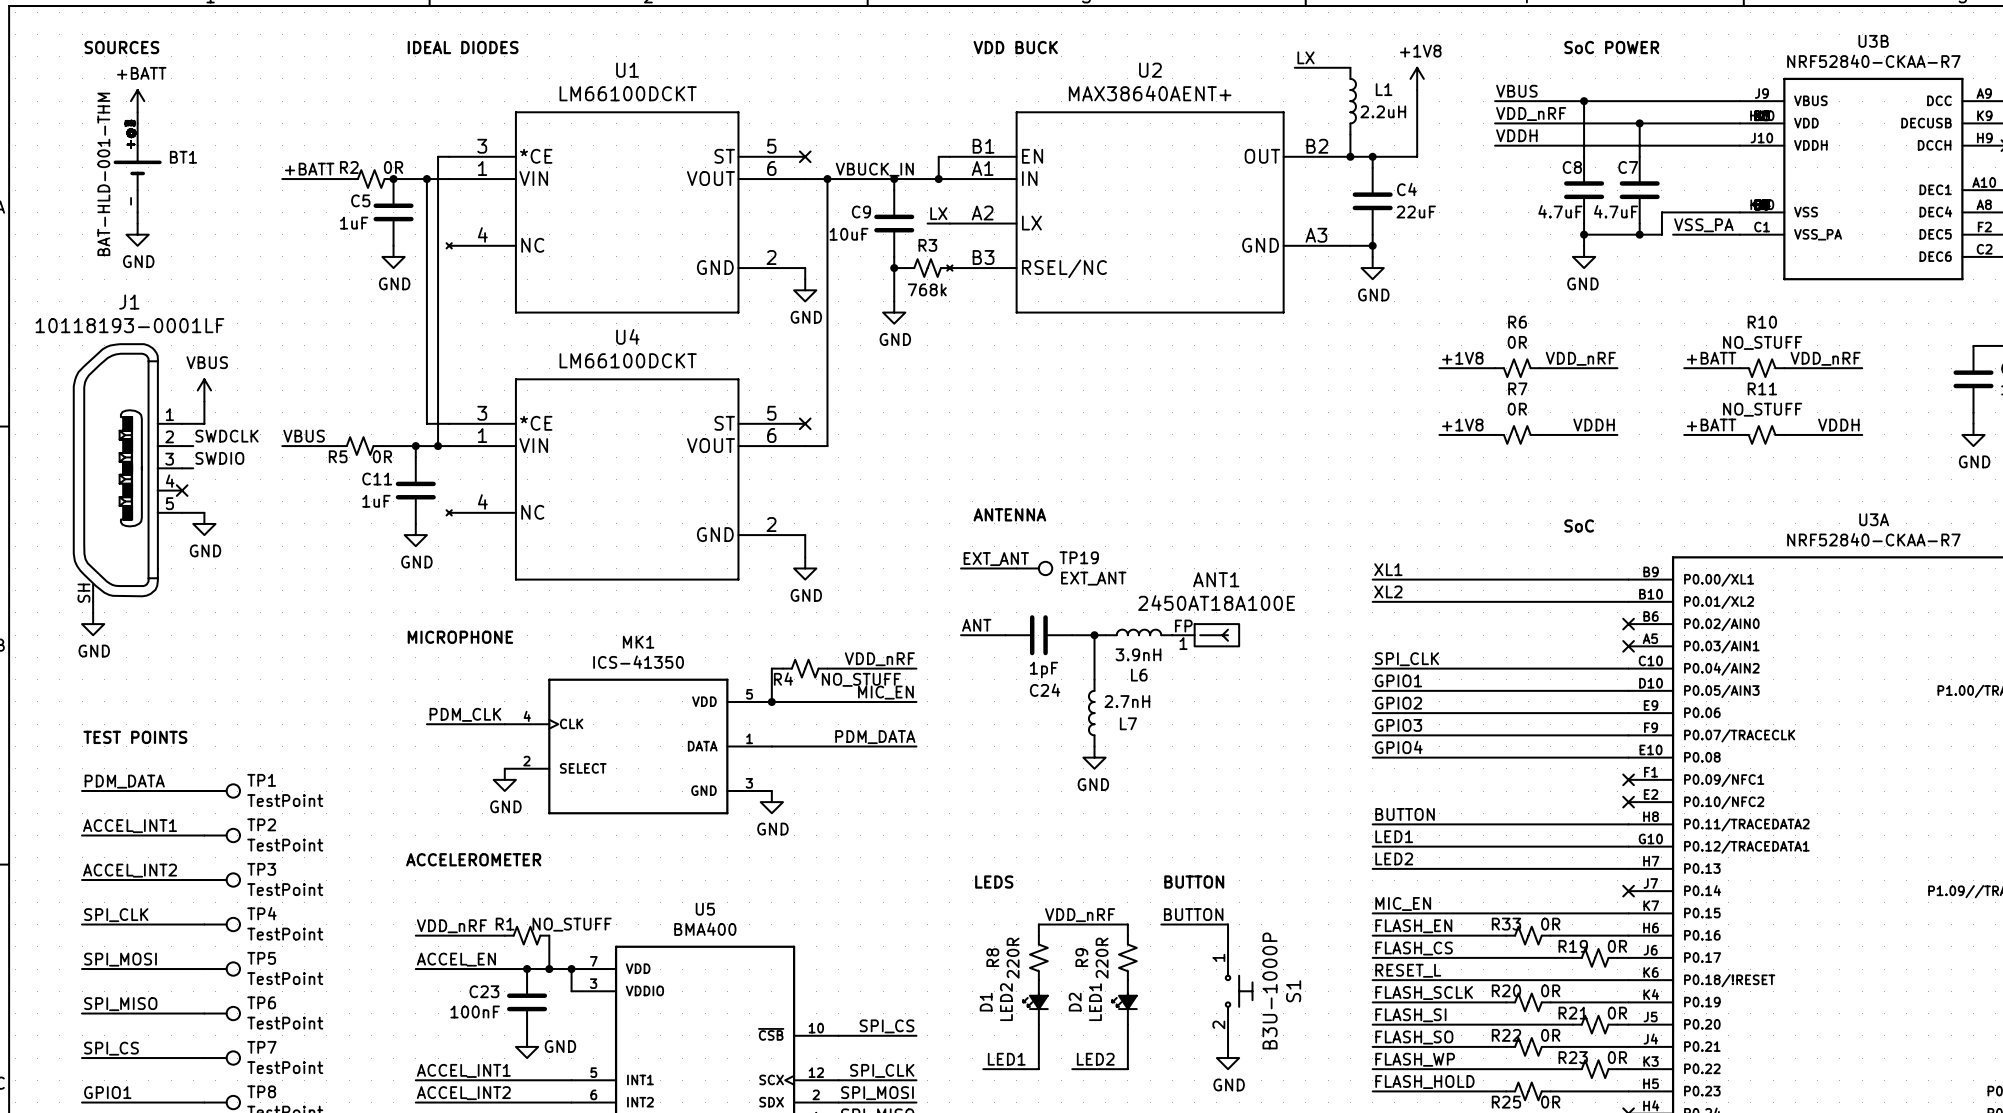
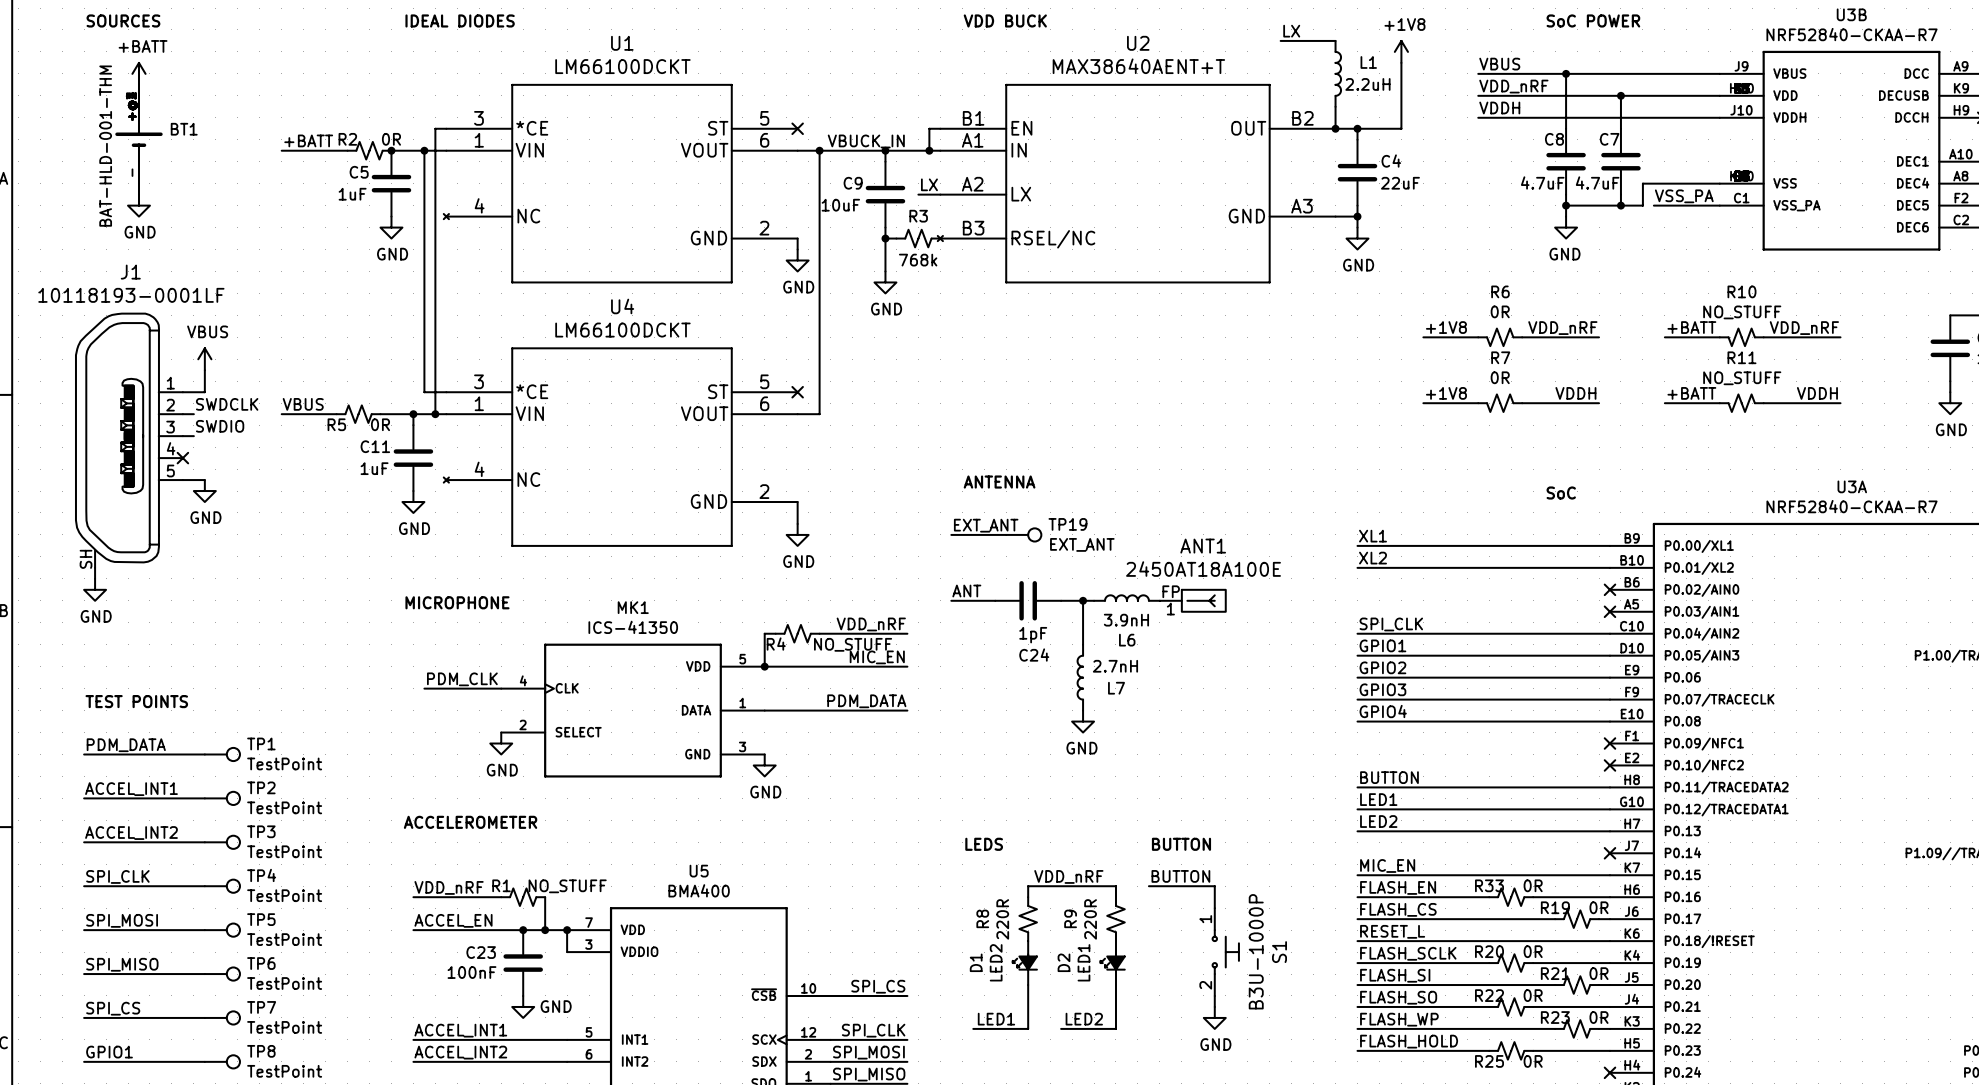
U2 value: MAX38640AENT+ (1150, 93) -> MAX38640AENT+T (1138, 66)

